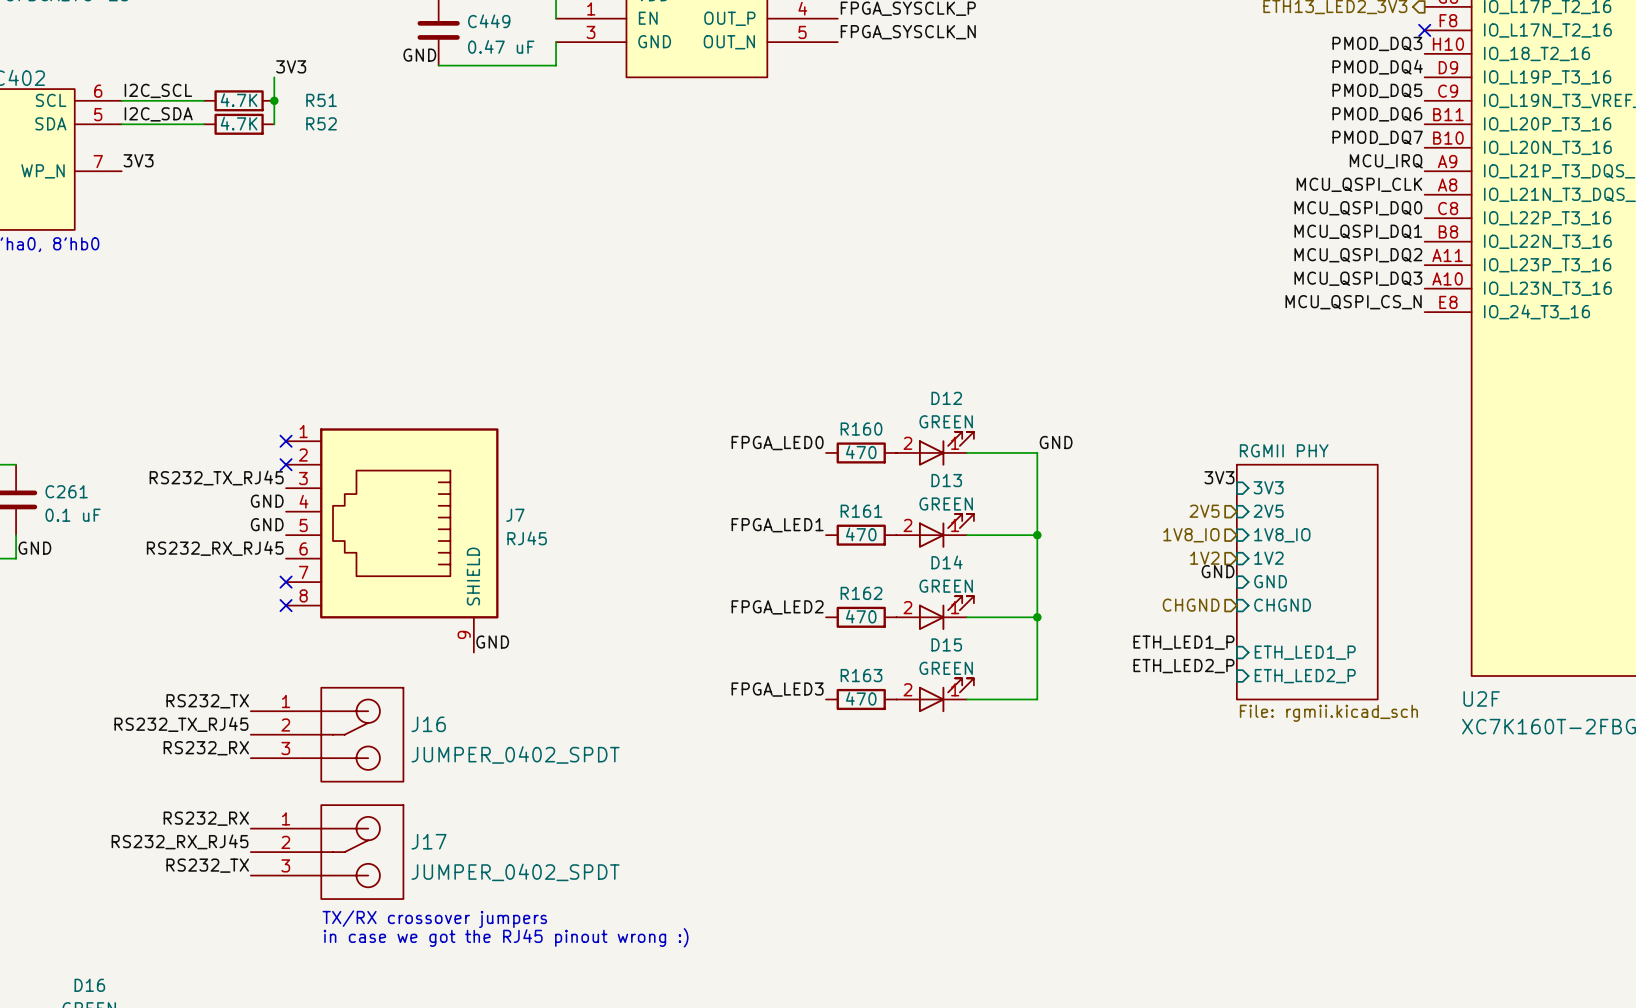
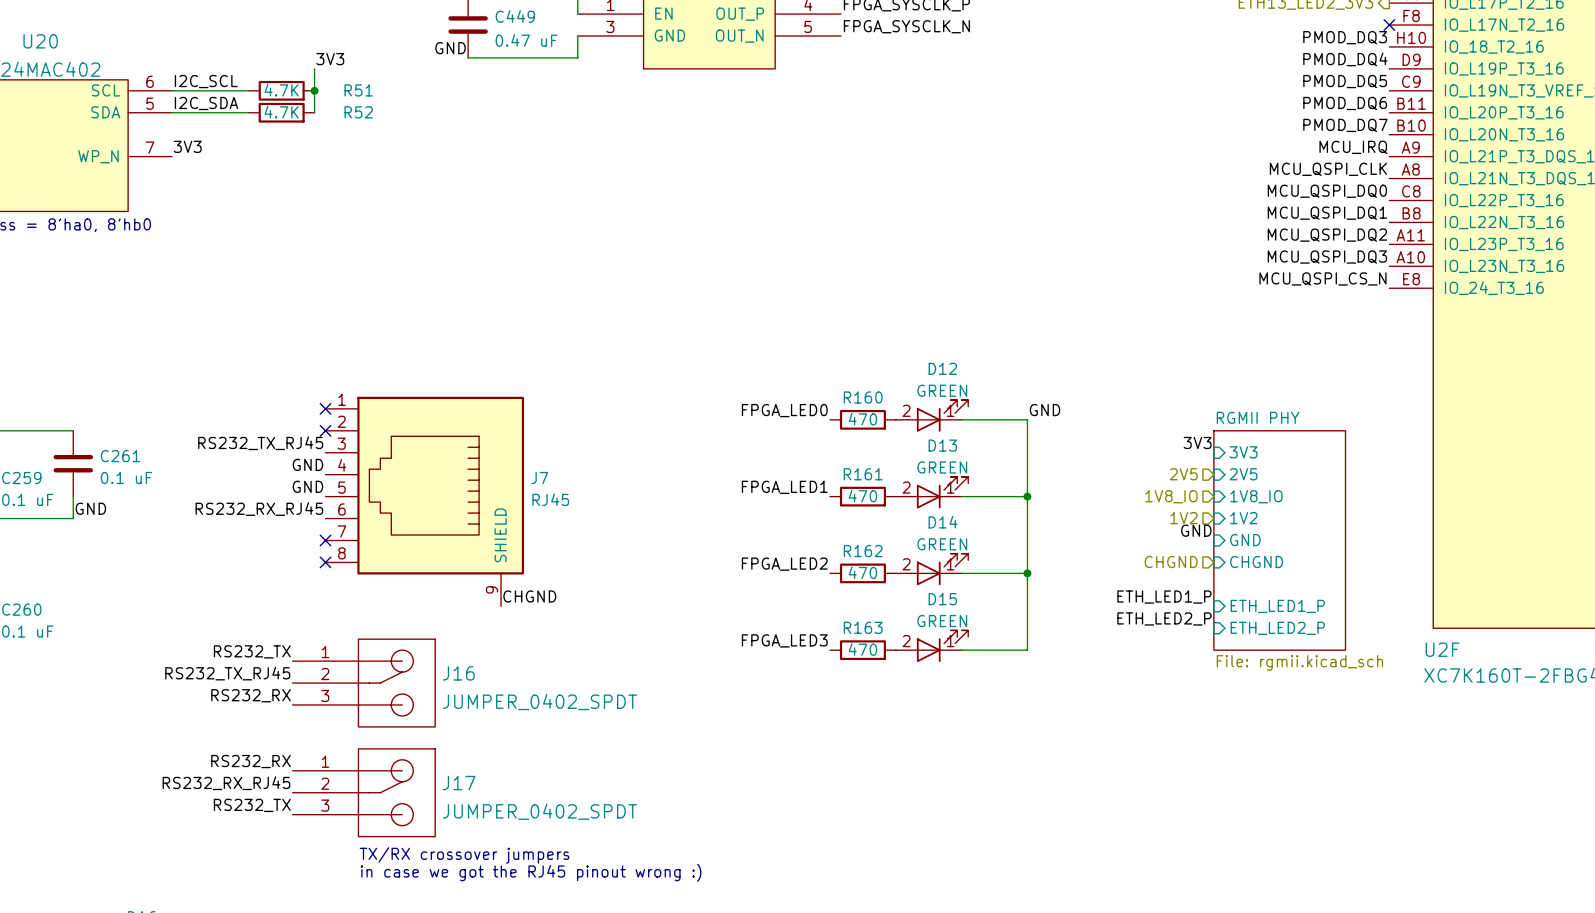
label: GND (492, 642) -> CHGND (529, 596)

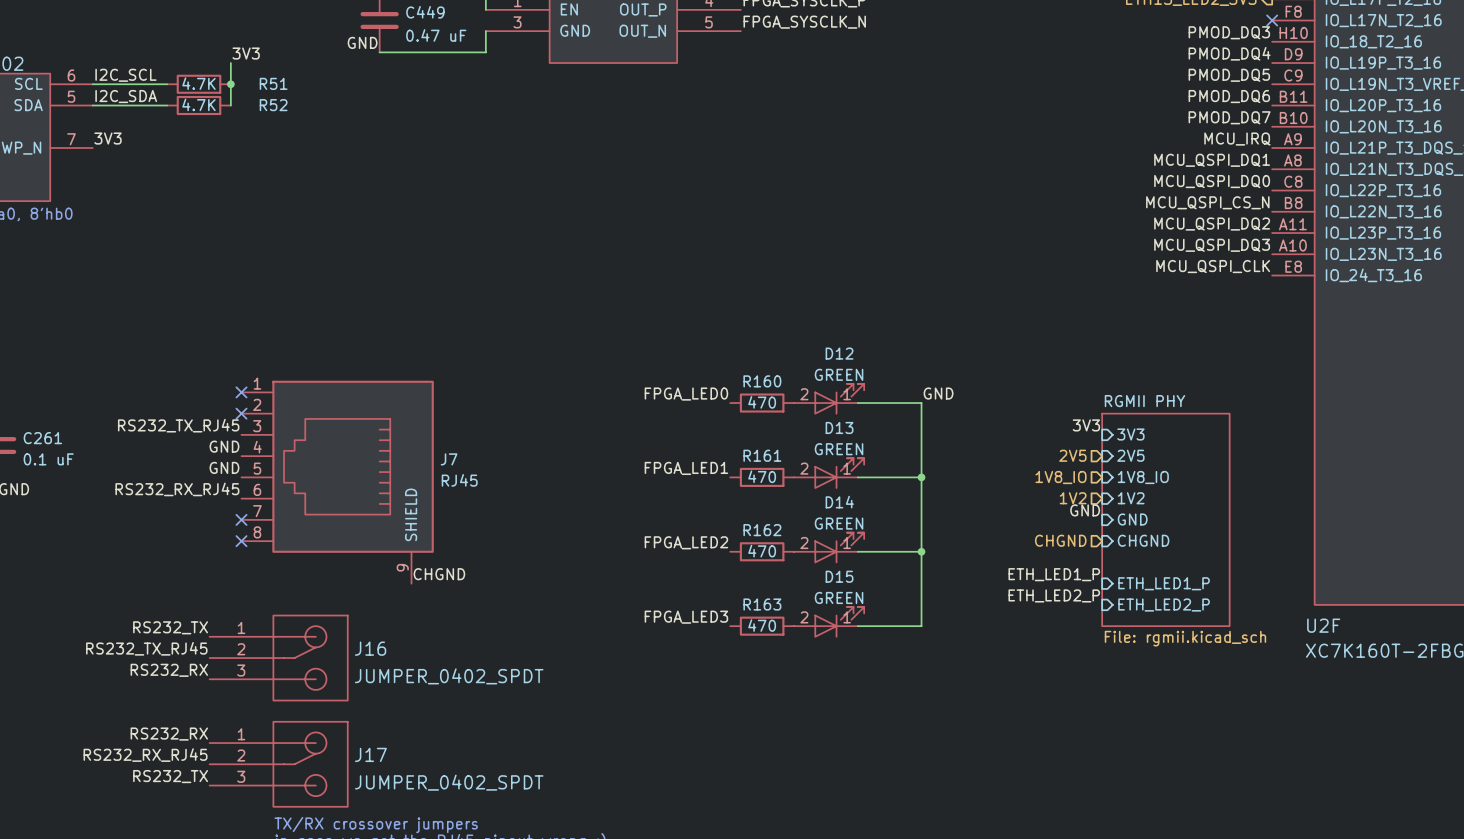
label: MCU_QSPI_CLK (1328, 169) -> MCU_QSPI_DQ1 (1212, 160)
label: MCU_QSPI_DQ1 (1327, 213) -> MCU_QSPI_CS_N (1207, 202)
label: MCU_QSPI_CS_N (1322, 278) -> MCU_QSPI_CLK (1213, 266)

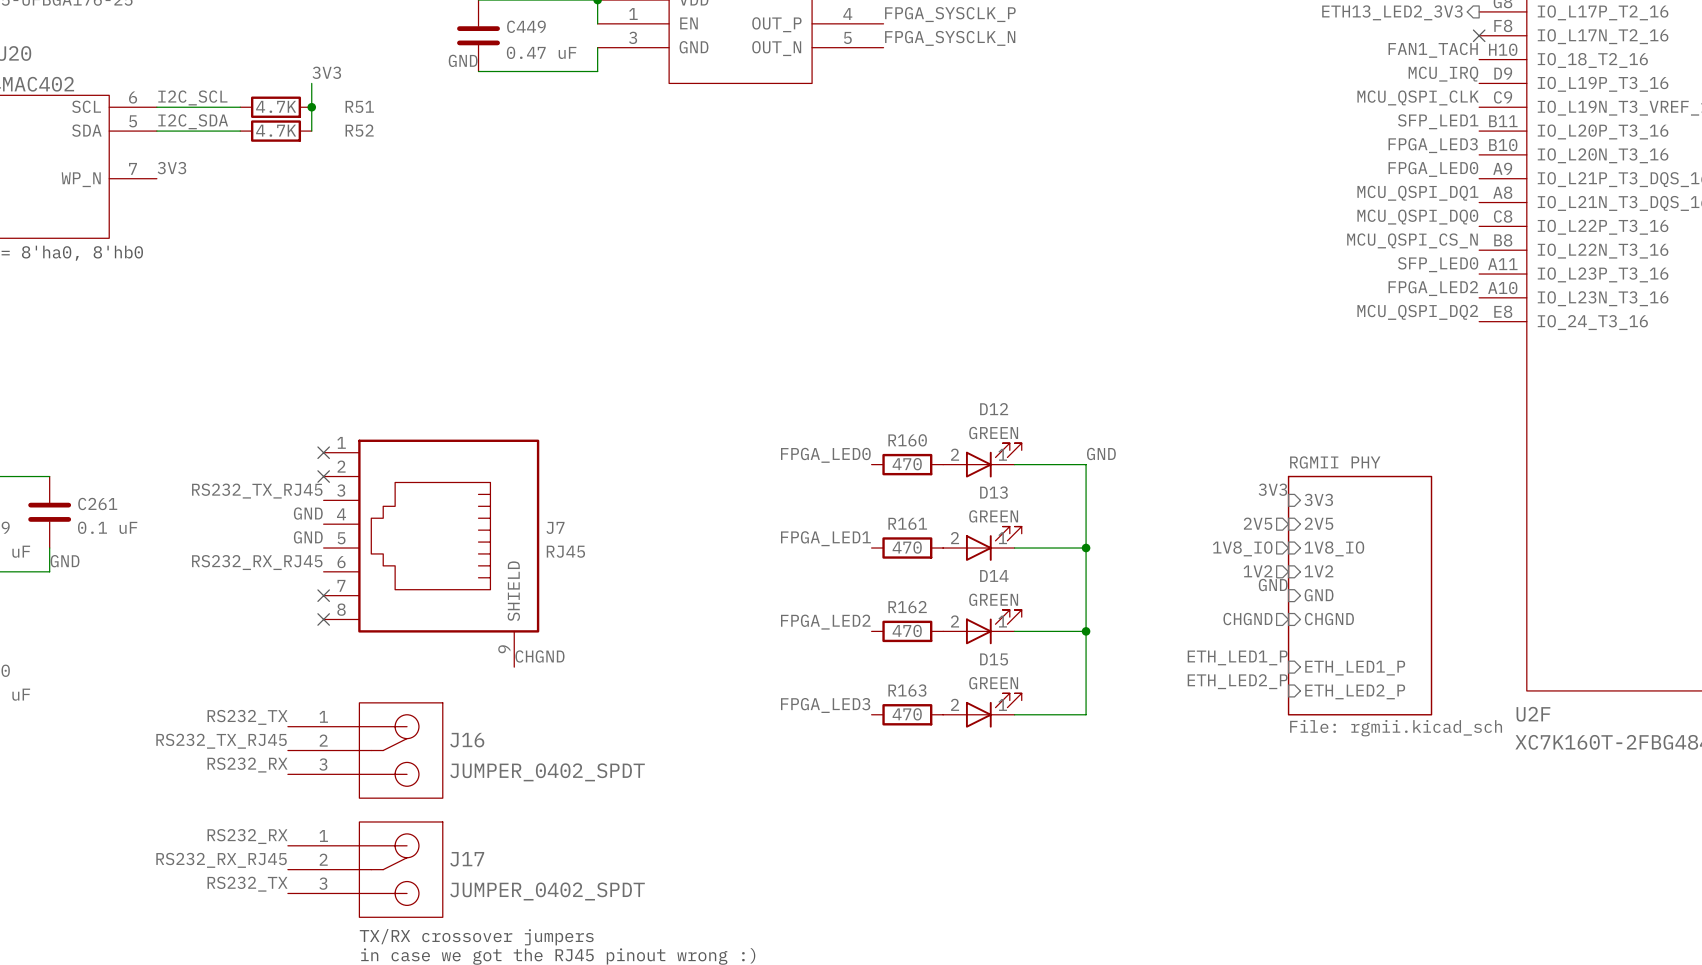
label: PMOD_DQ3 (1229, 32) -> FAN1_TACH (1433, 50)
label: PMOD_DQ4 (1229, 53) -> MCU_IRQ (1443, 74)
label: PMOD_DQ5 (1229, 75) -> MCU_QSPI_CLK (1418, 97)
label: PMOD_DQ6 (1229, 96) -> SFP_LED1 (1438, 121)
label: PMOD_DQ7 (1229, 117) -> FPGA_LED3 (1433, 145)
label: MCU_IRQ (1237, 139) -> FPGA_LED0 (1433, 169)
label: MCU_QSPI_DQ2 (1212, 224) -> SFP_LED0 (1438, 264)
label: MCU_QSPI_DQ3 (1212, 245) -> FPGA_LED2 (1433, 288)
label: MCU_QSPI_CLK (1213, 266) -> MCU_QSPI_DQ2 (1417, 312)

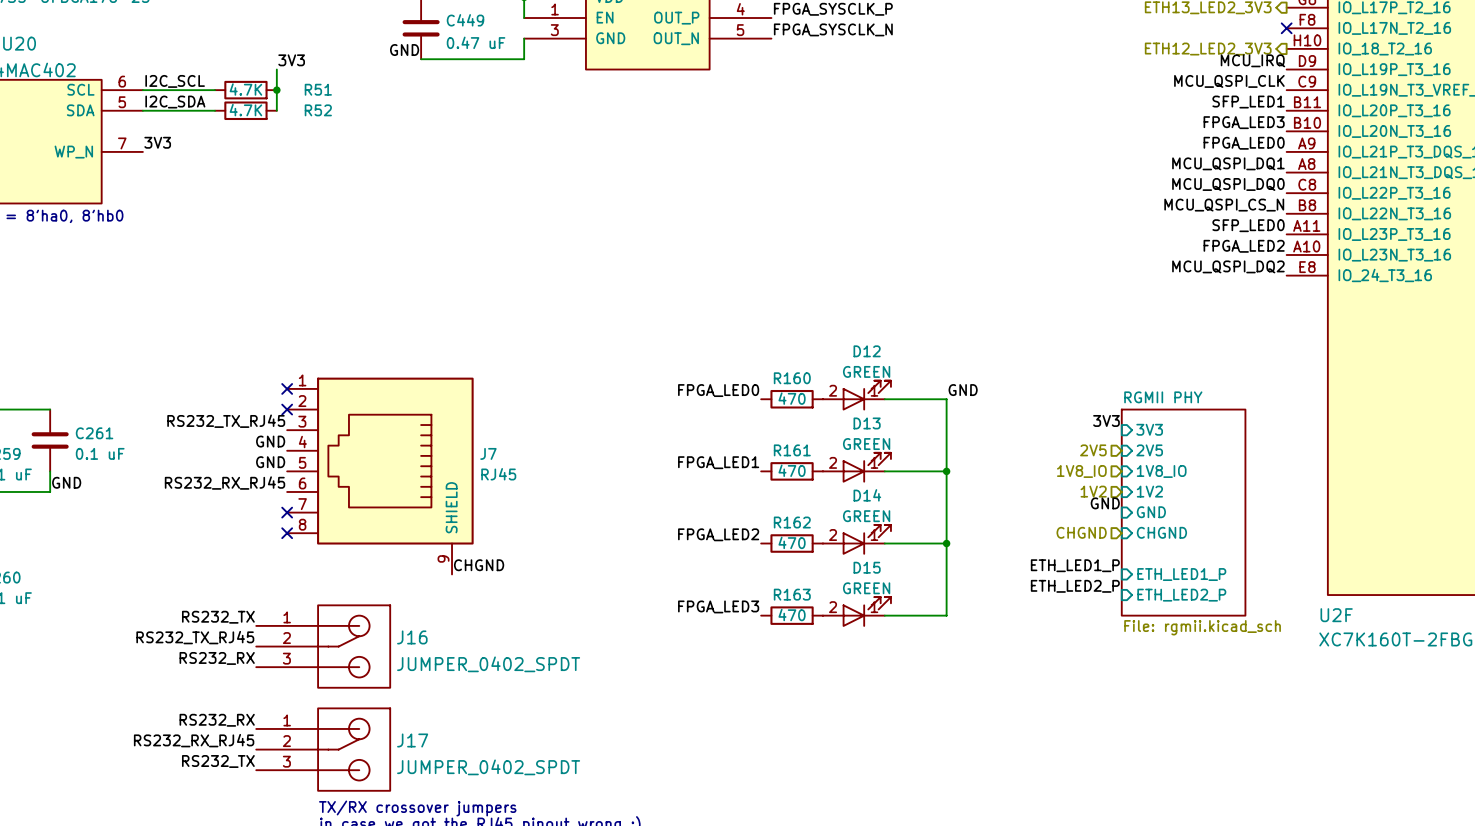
label: FAN1_TACH (1433, 50) -> none
hierarchical label: none -> ETH12_LED2_3V3 (1208, 49)

